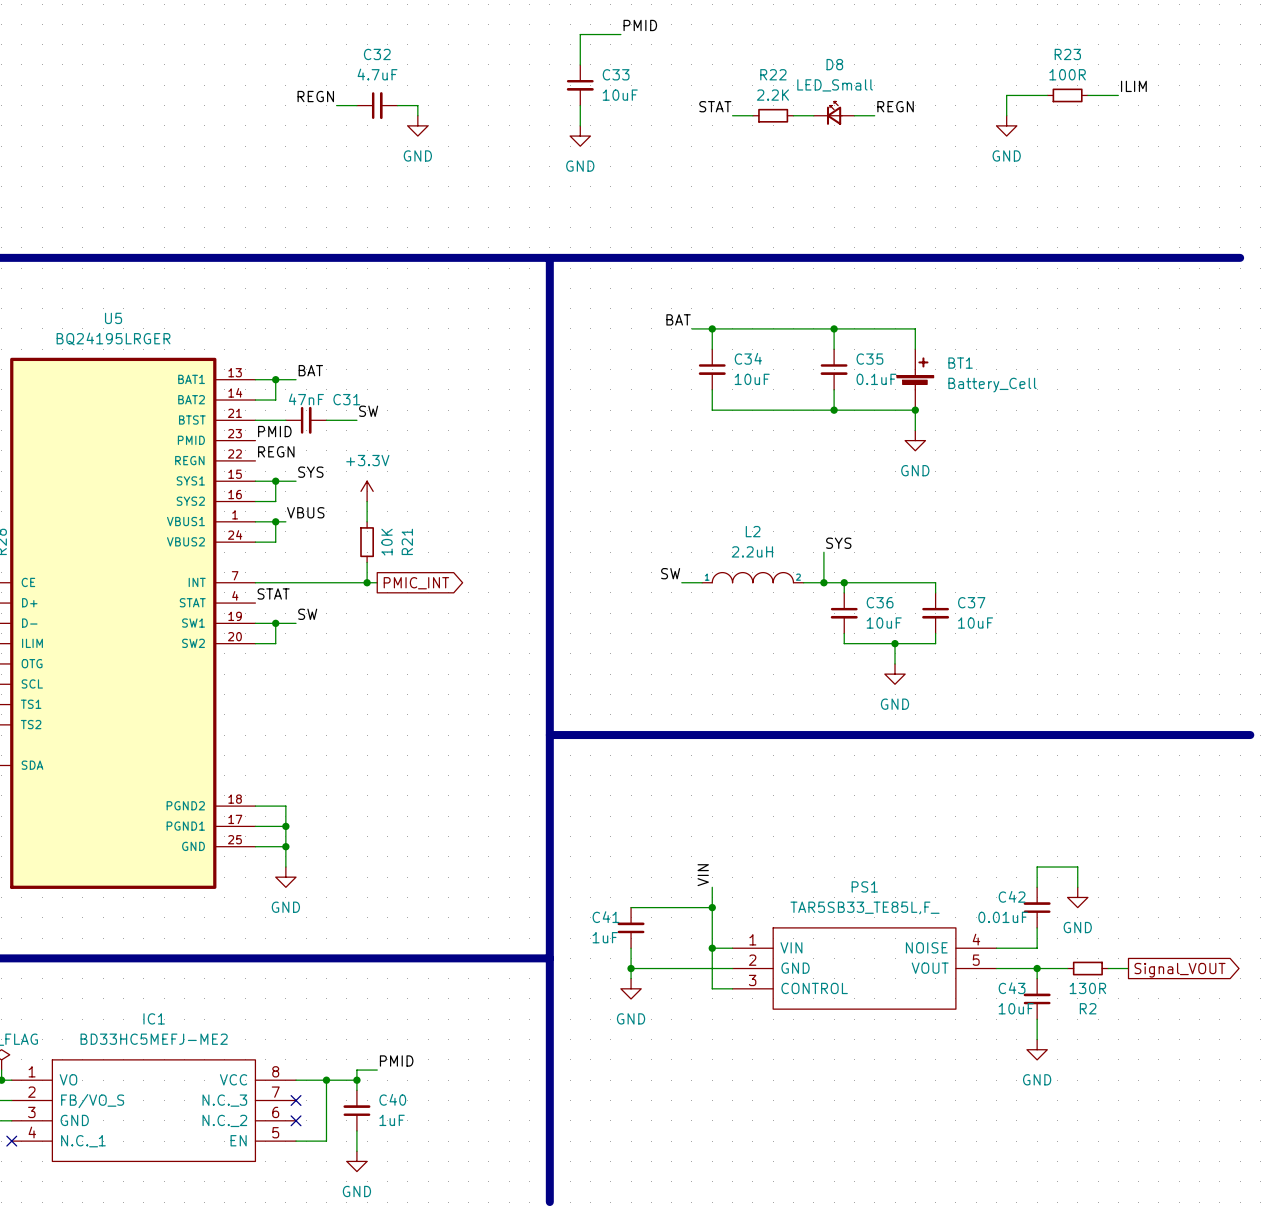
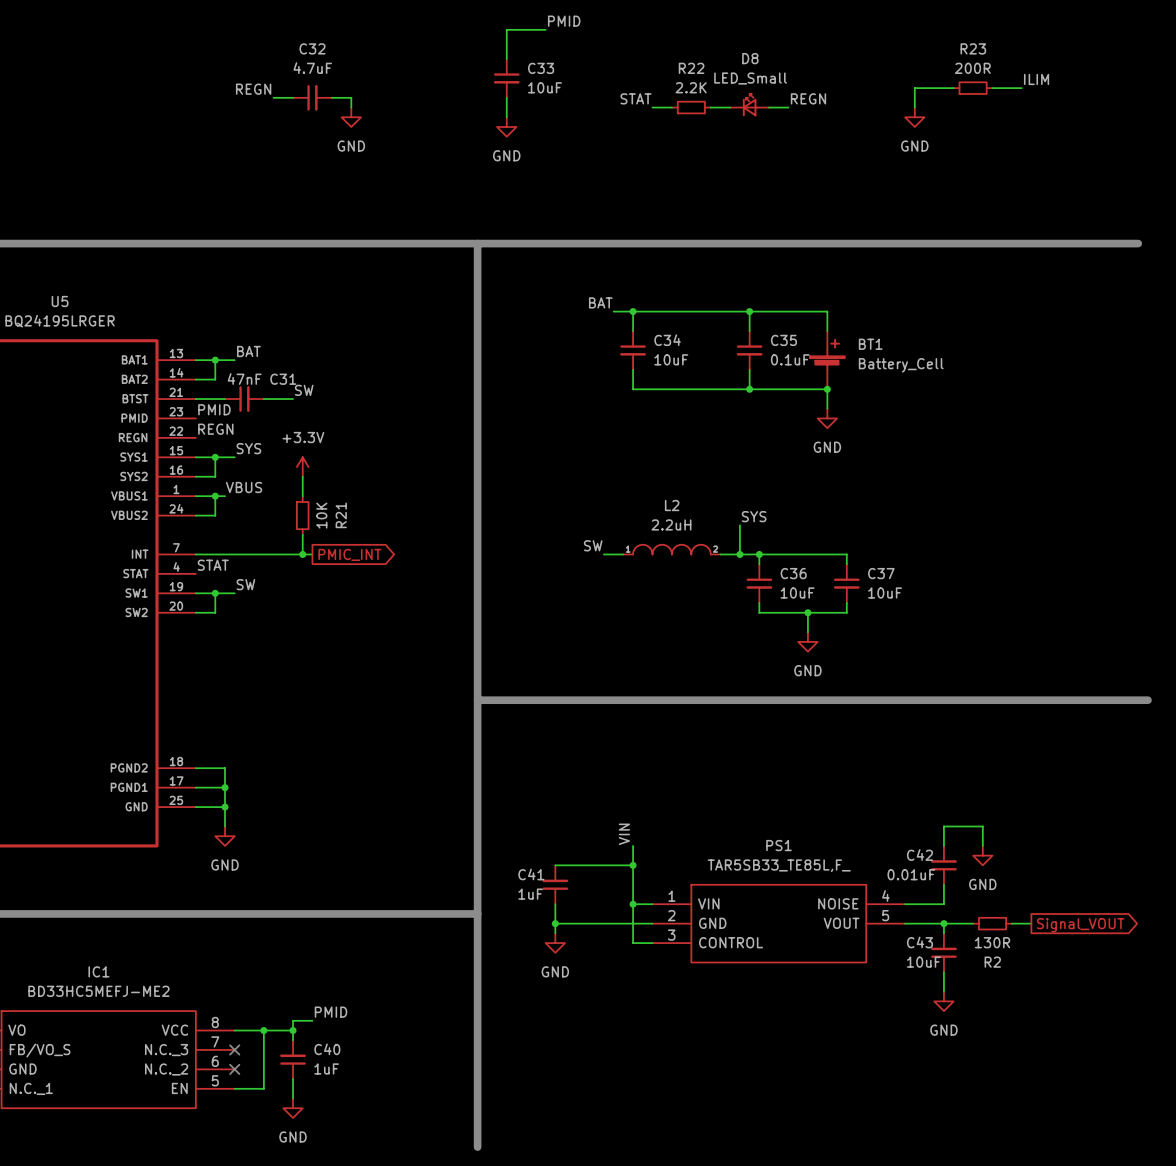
R23 value: 100R (1067, 74) -> 200R (972, 68)

